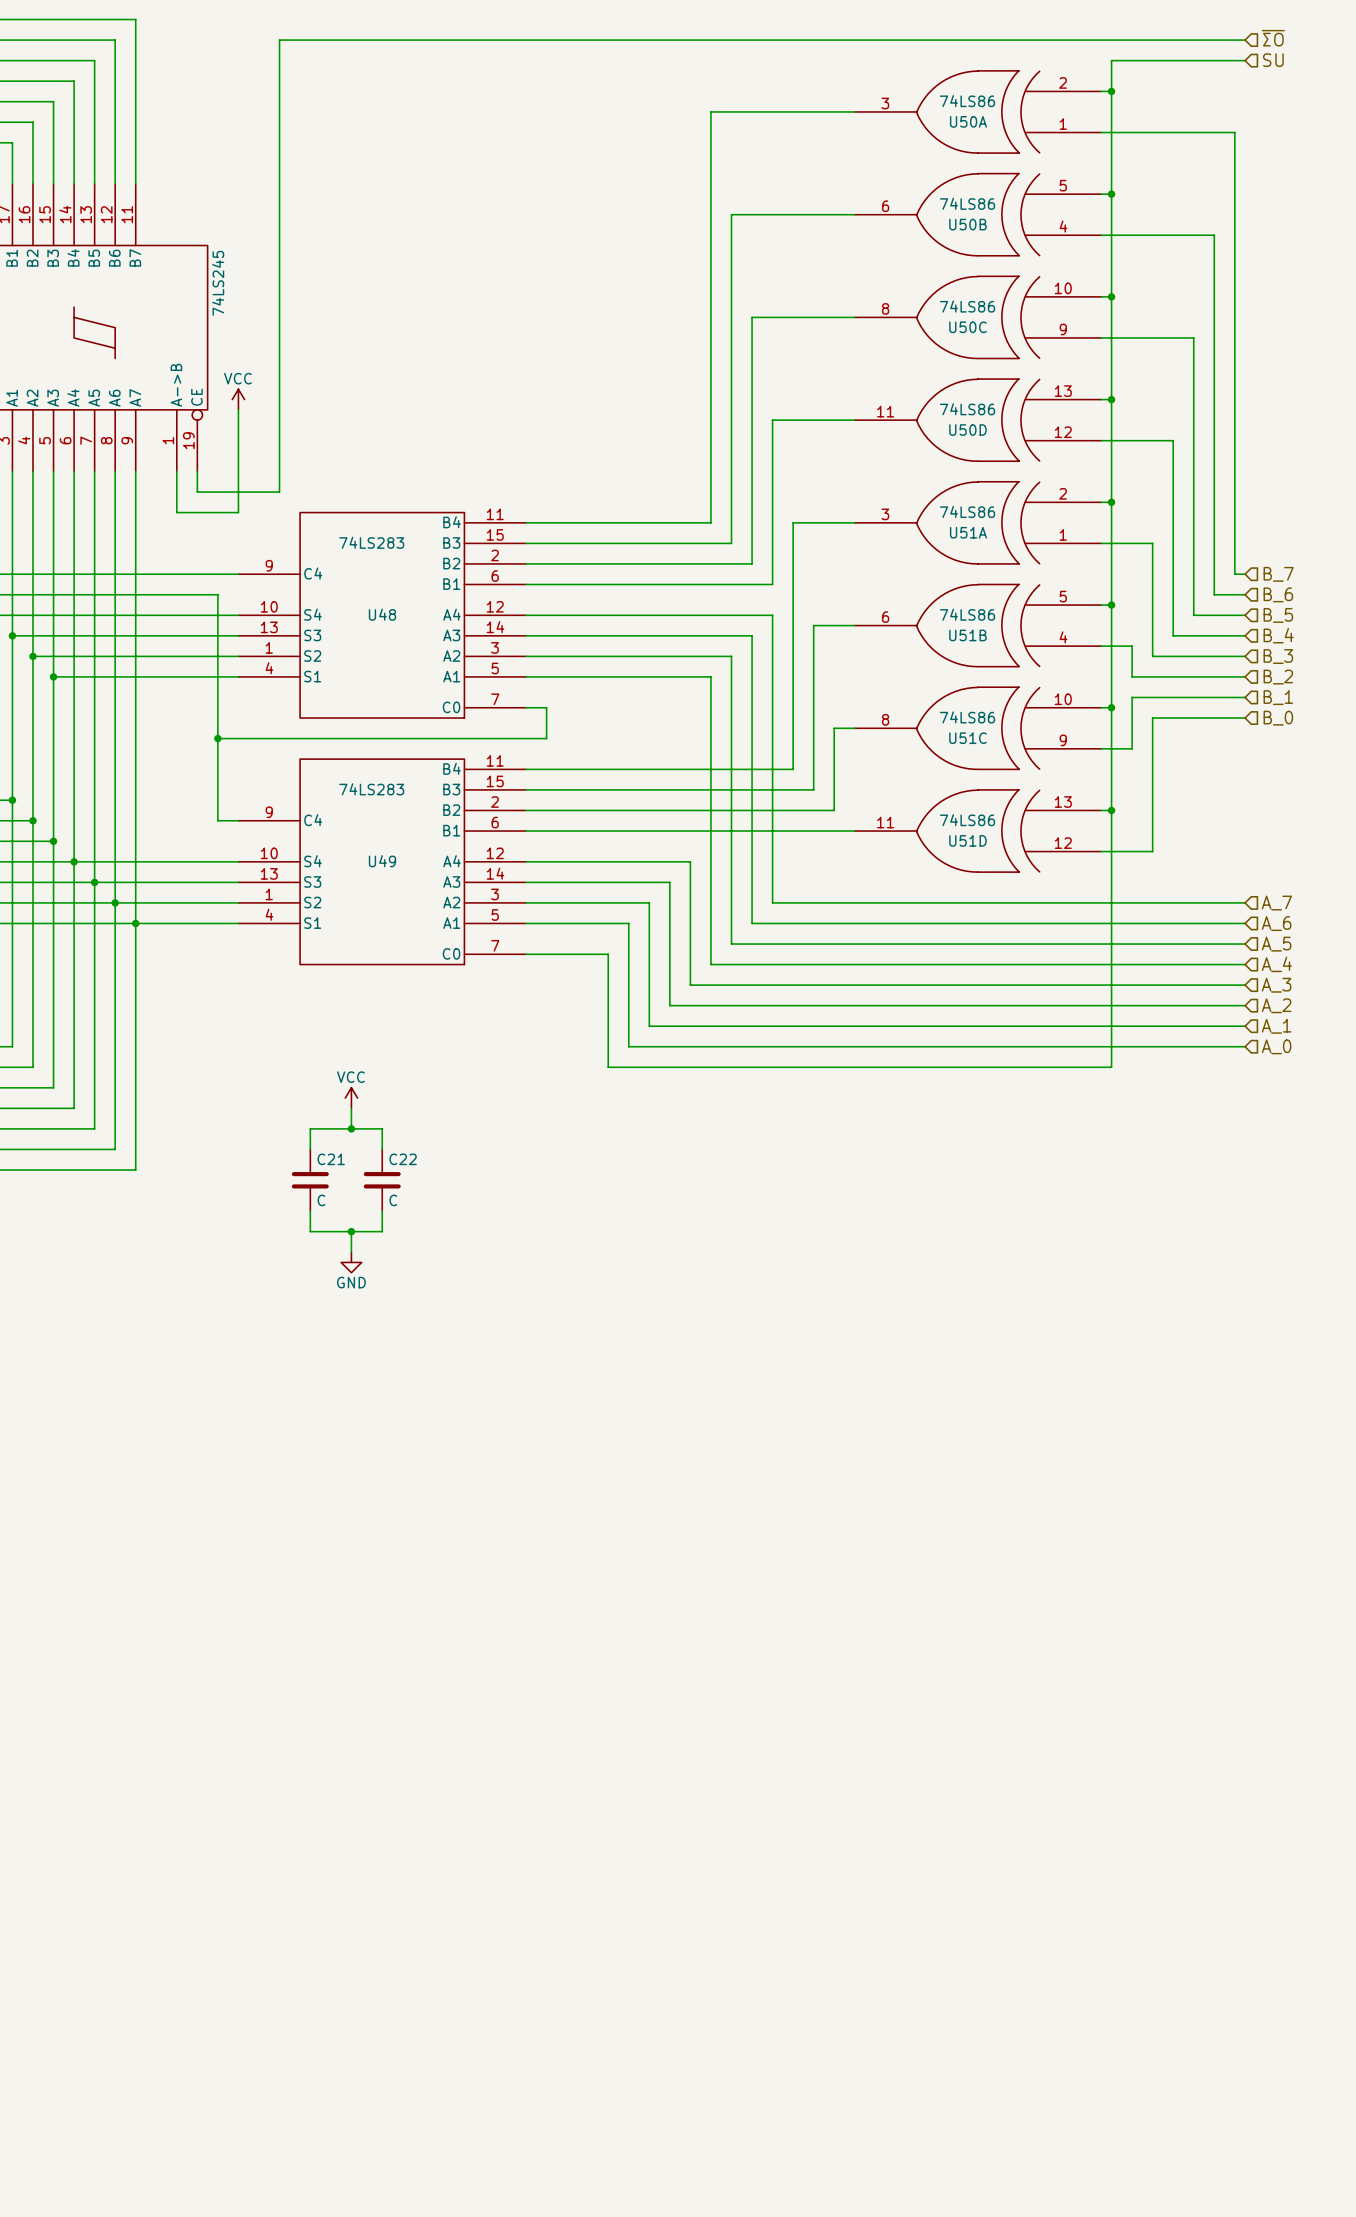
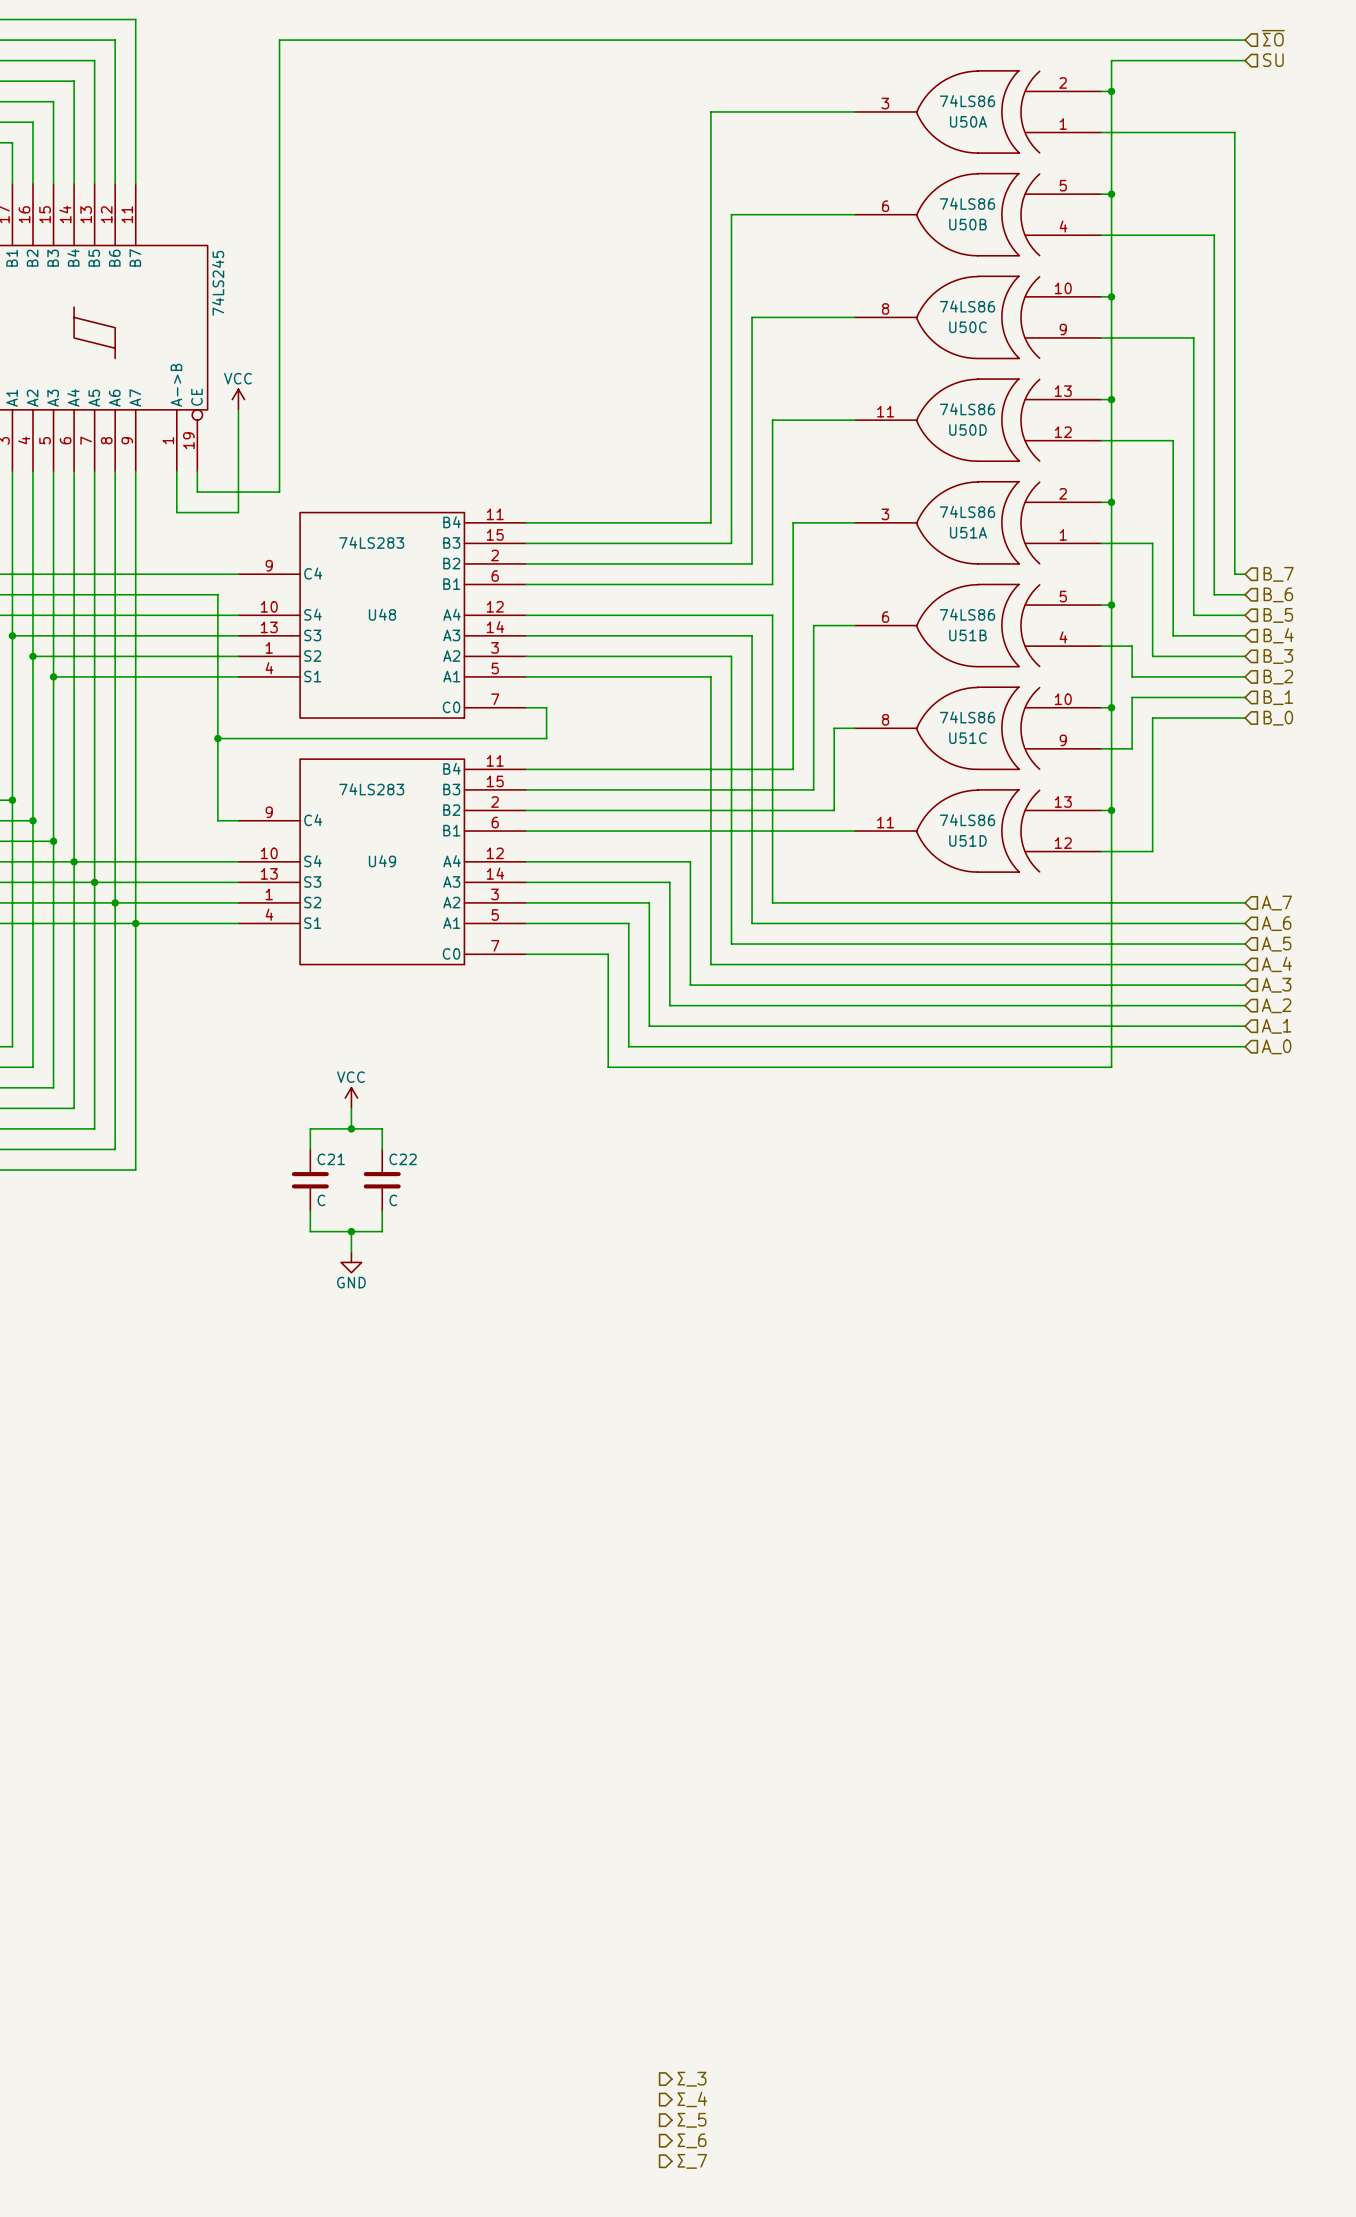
hierarchical label: none -> Σ_3 (691, 2079)
hierarchical label: none -> Σ_4 (692, 2099)
hierarchical label: none -> Σ_5 (691, 2120)
hierarchical label: none -> Σ_6 (691, 2140)
hierarchical label: none -> Σ_7 (692, 2161)

